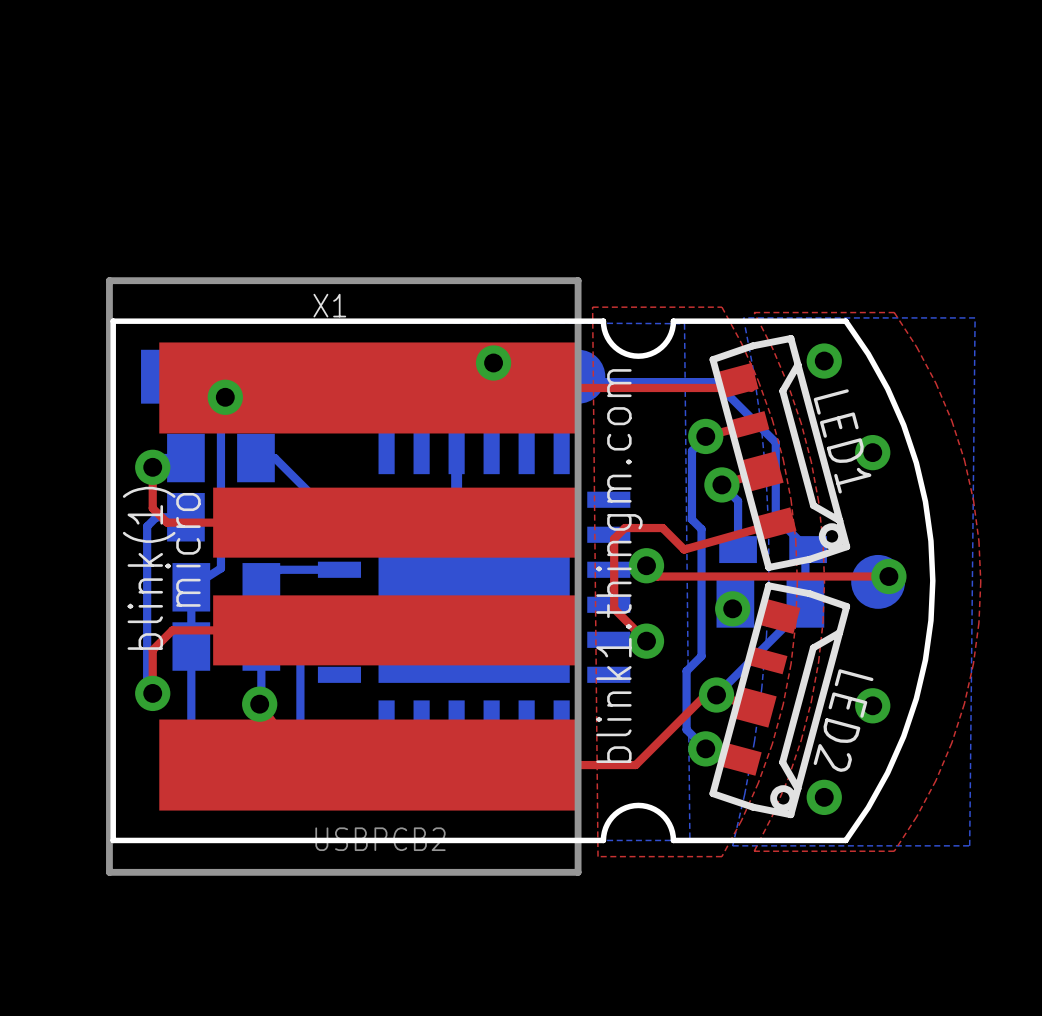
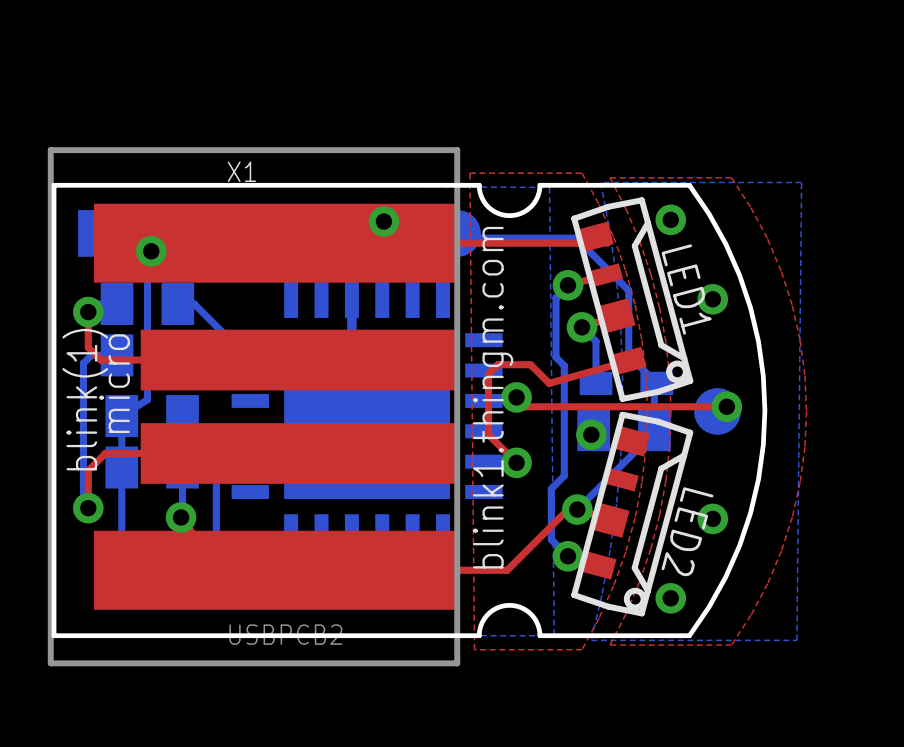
bottom track: (339, 569) (278, 569) (261, 587) -> none

